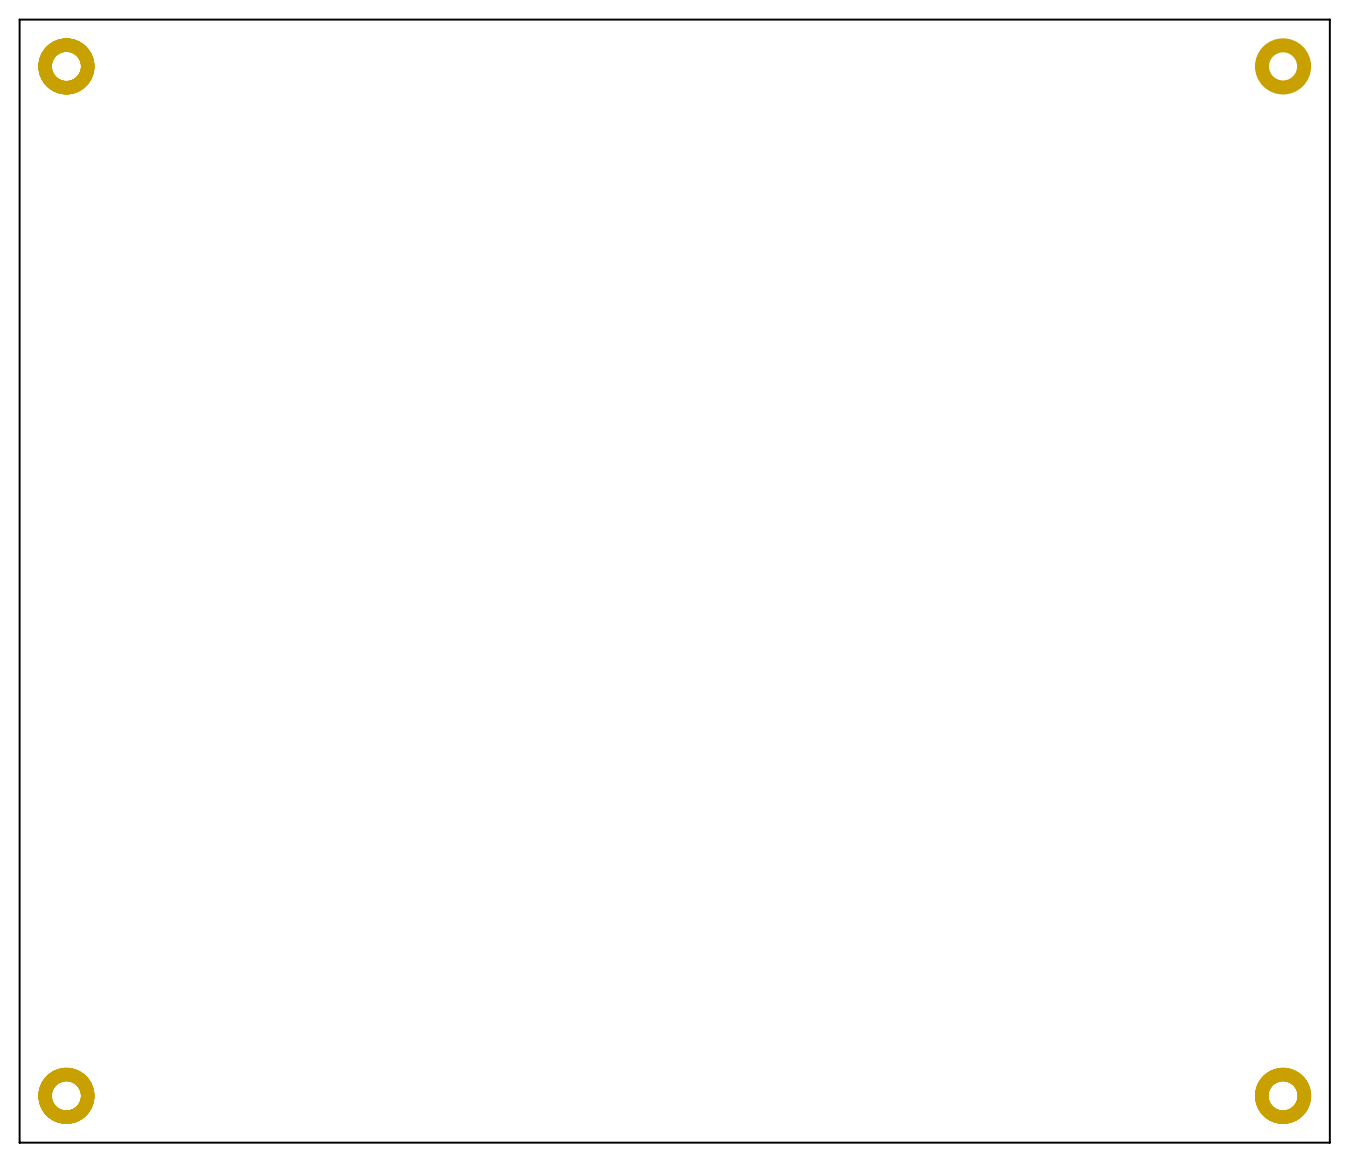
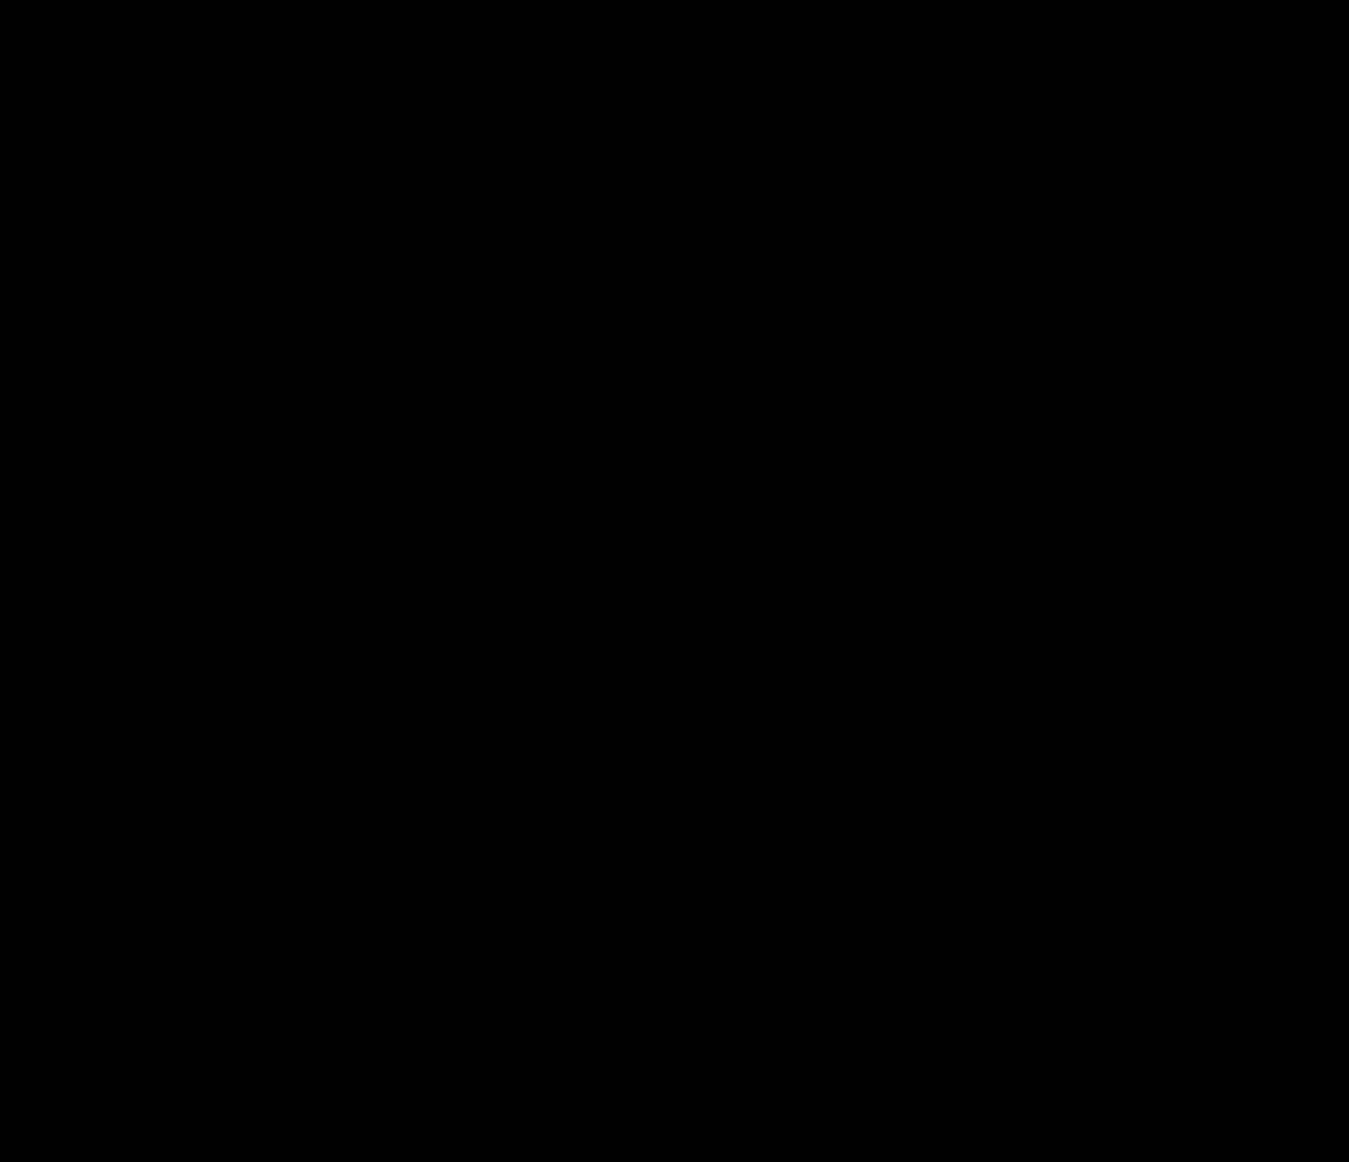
board edge: (1329, 19) (19, 19) (19, 1142) (1329, 1142) (1329, 19) -> none
part: (66, 66) -> none
part: (1283, 66) -> none
part: (66, 1095) -> none
part: (1283, 1095) -> none

